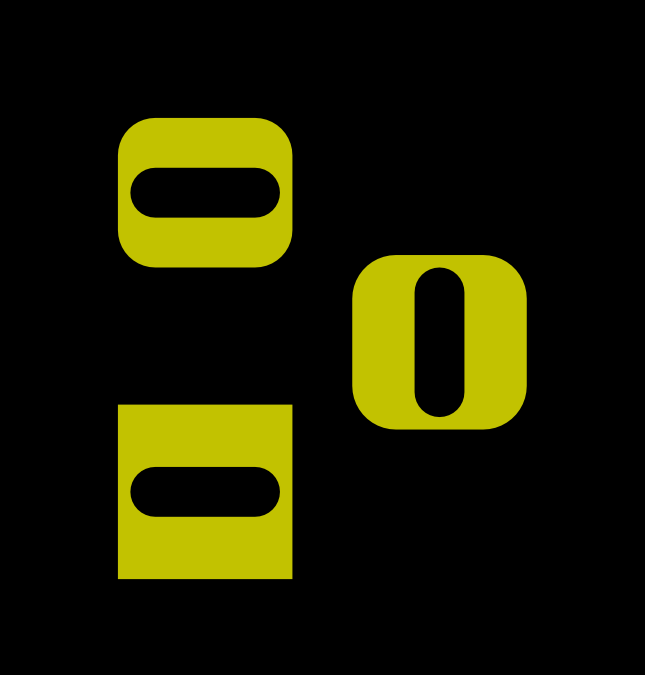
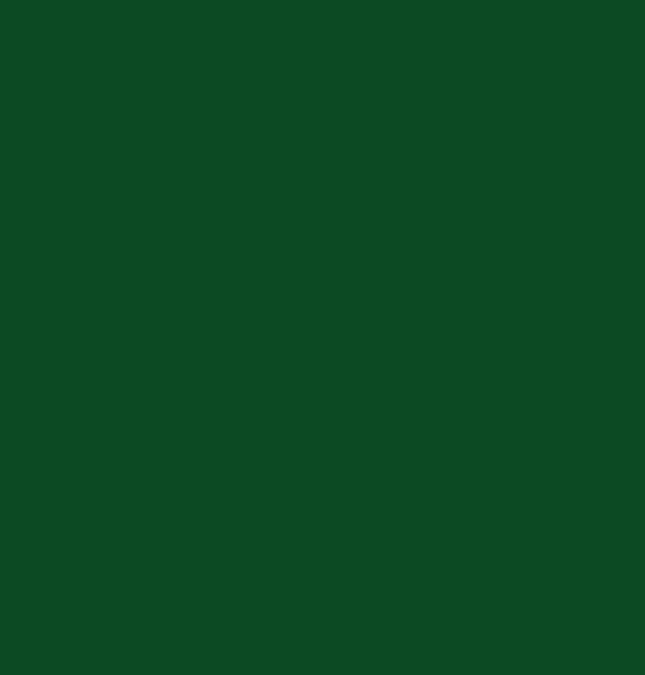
part: (322, 348) -> none

